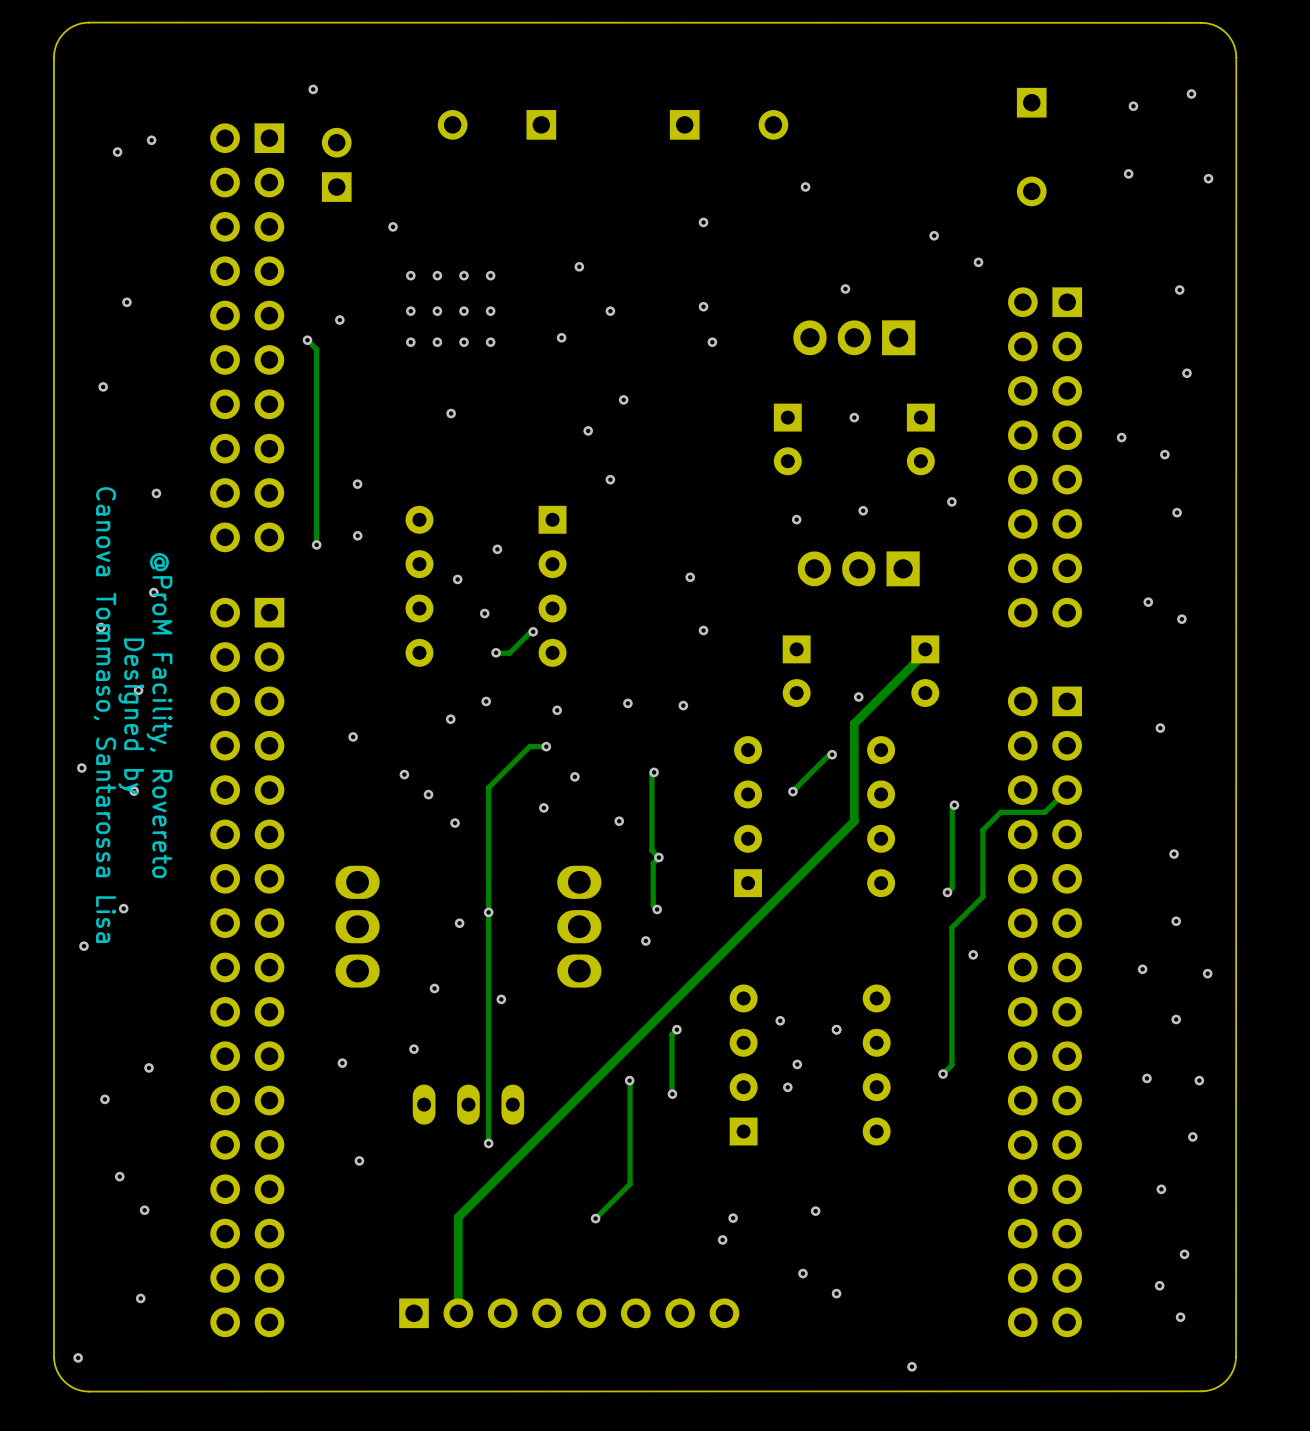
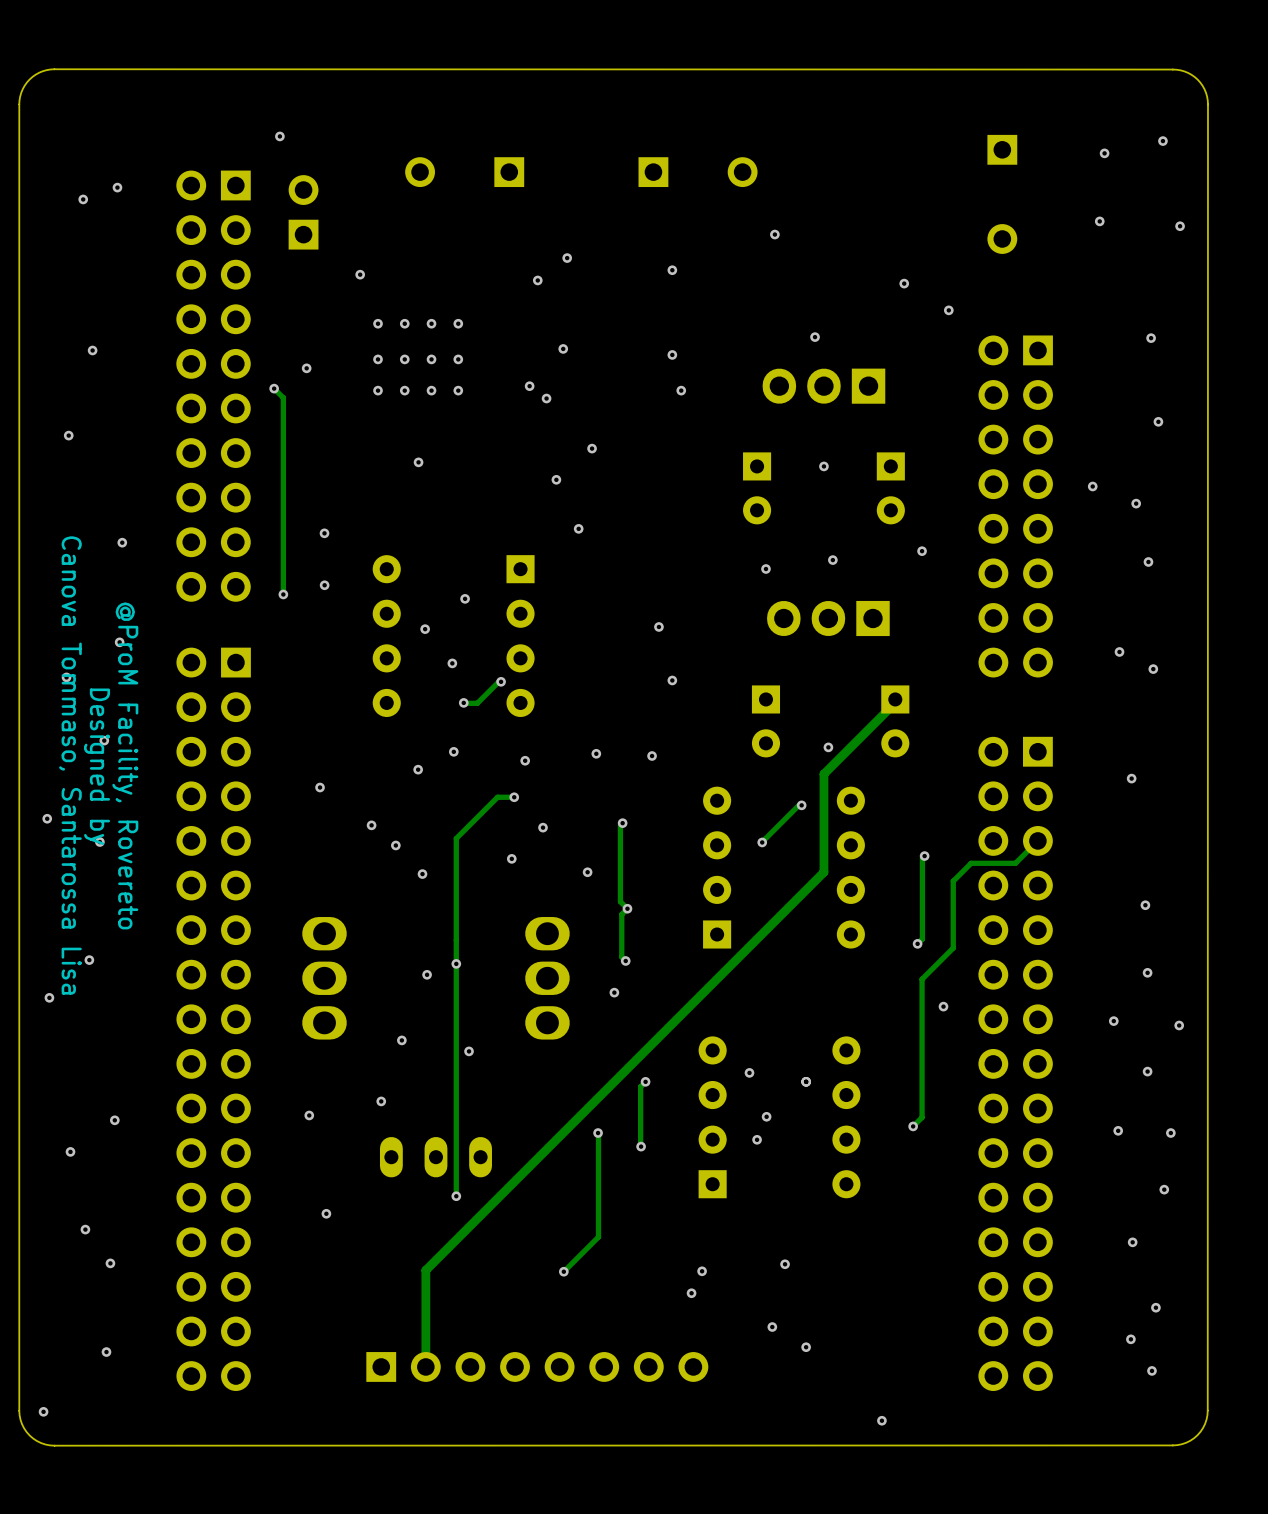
via: none -> (567, 258)
via: none -> (537, 280)
via: (579, 266) -> none
via: none -> (563, 348)
via: (610, 311) -> none
via: none -> (546, 398)

